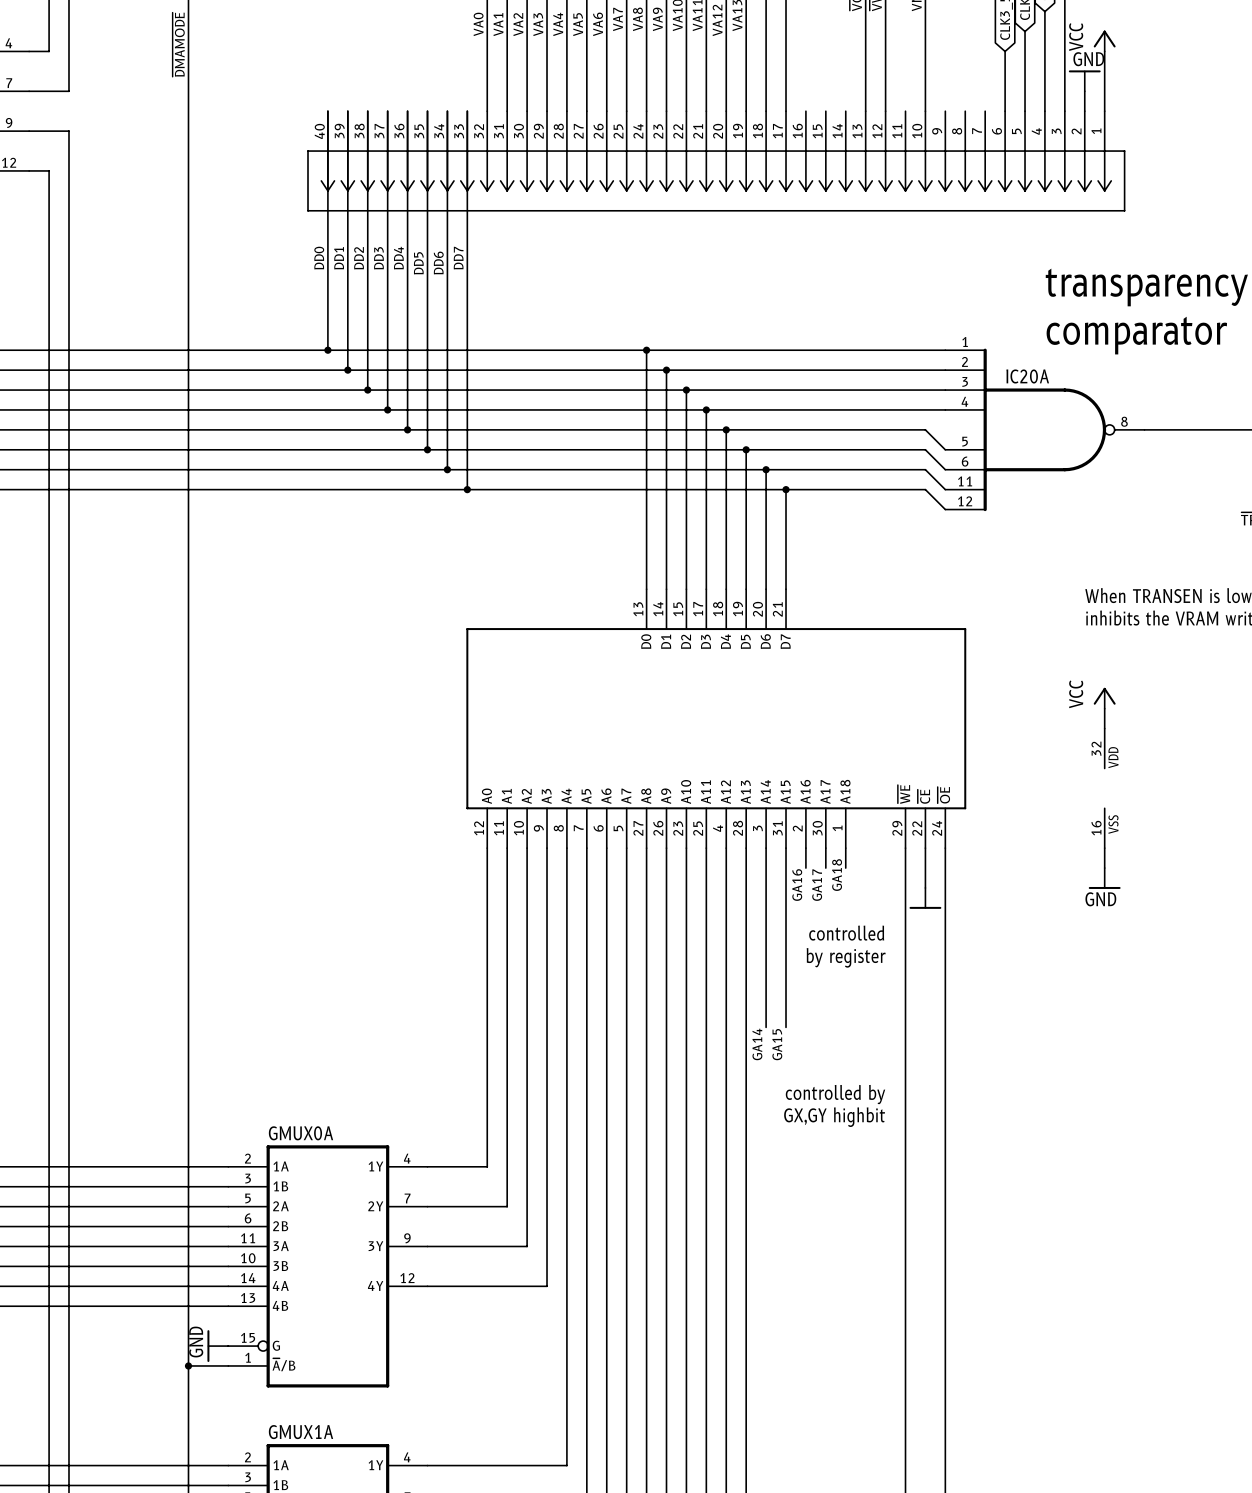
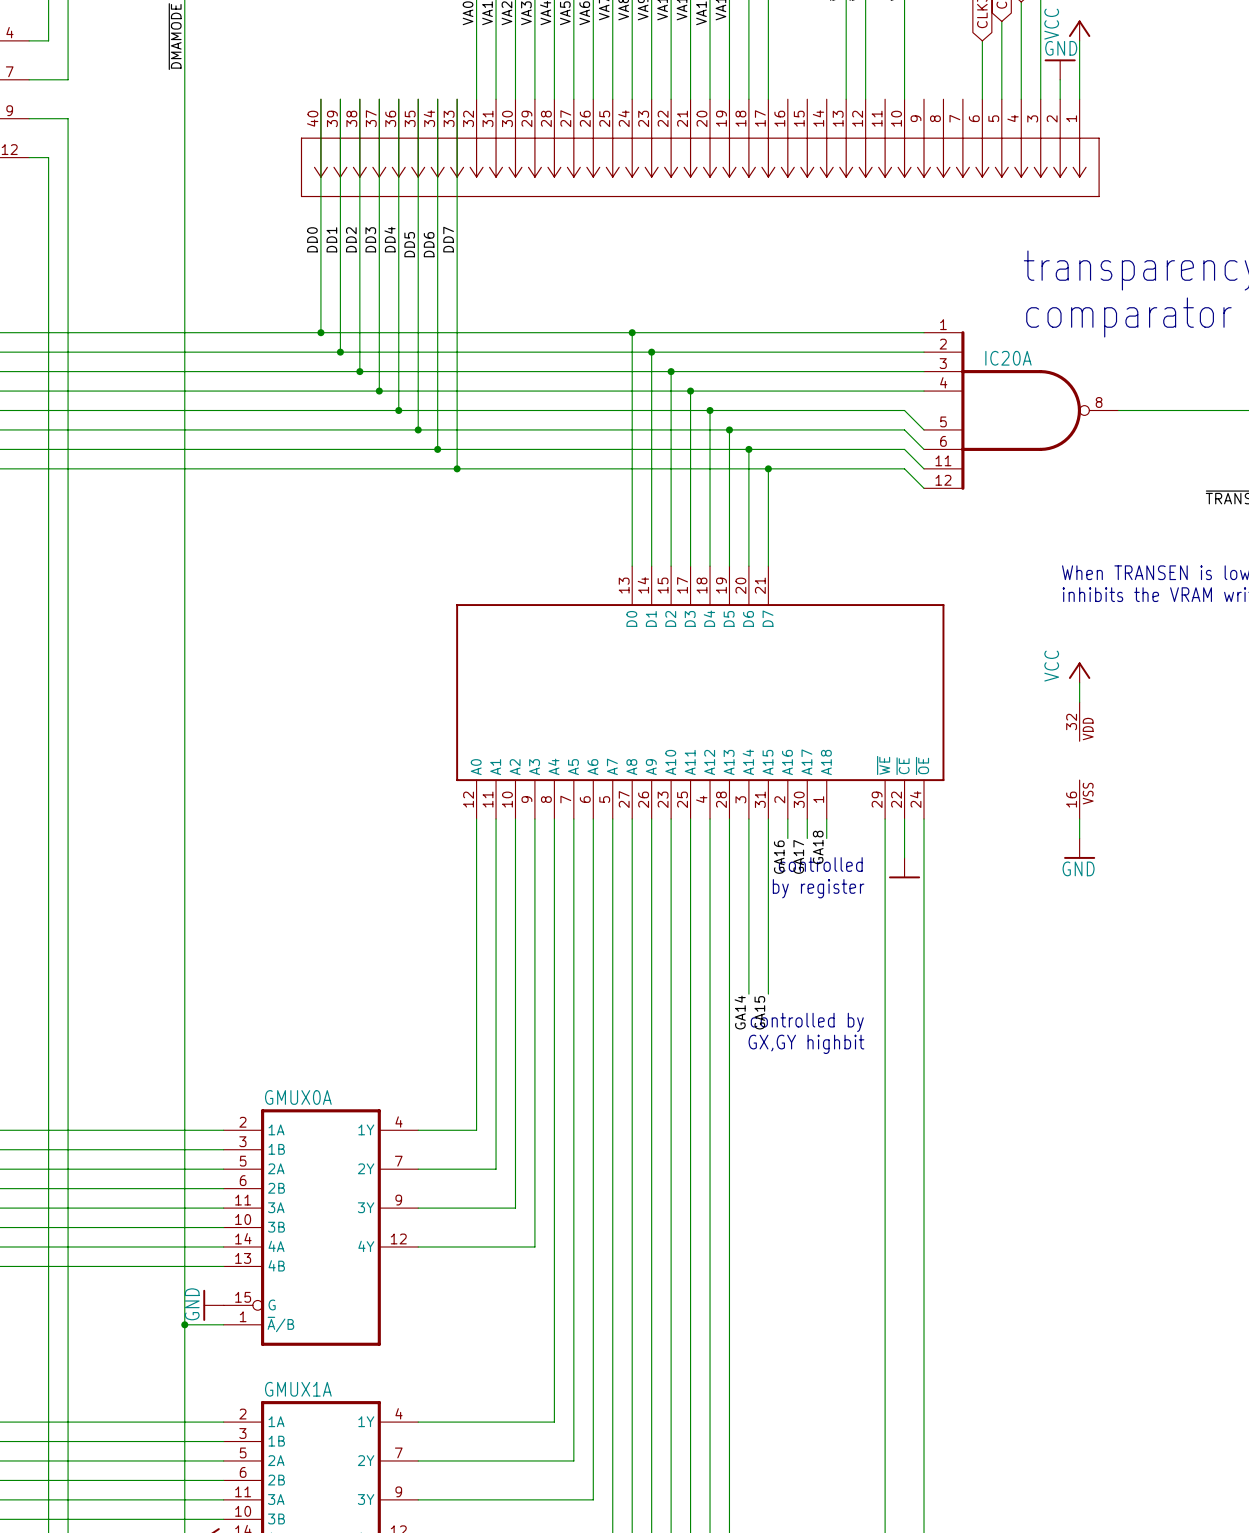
text: none -> controlled (820, 864)
text: controlled (846, 933) -> by register (818, 888)
text: by register (846, 957) -> none
text: none -> controlled by (807, 1022)
text: controlled by (835, 1094) -> GX,GY highbit (806, 1044)
text: GX,GY highbit (834, 1117) -> none

